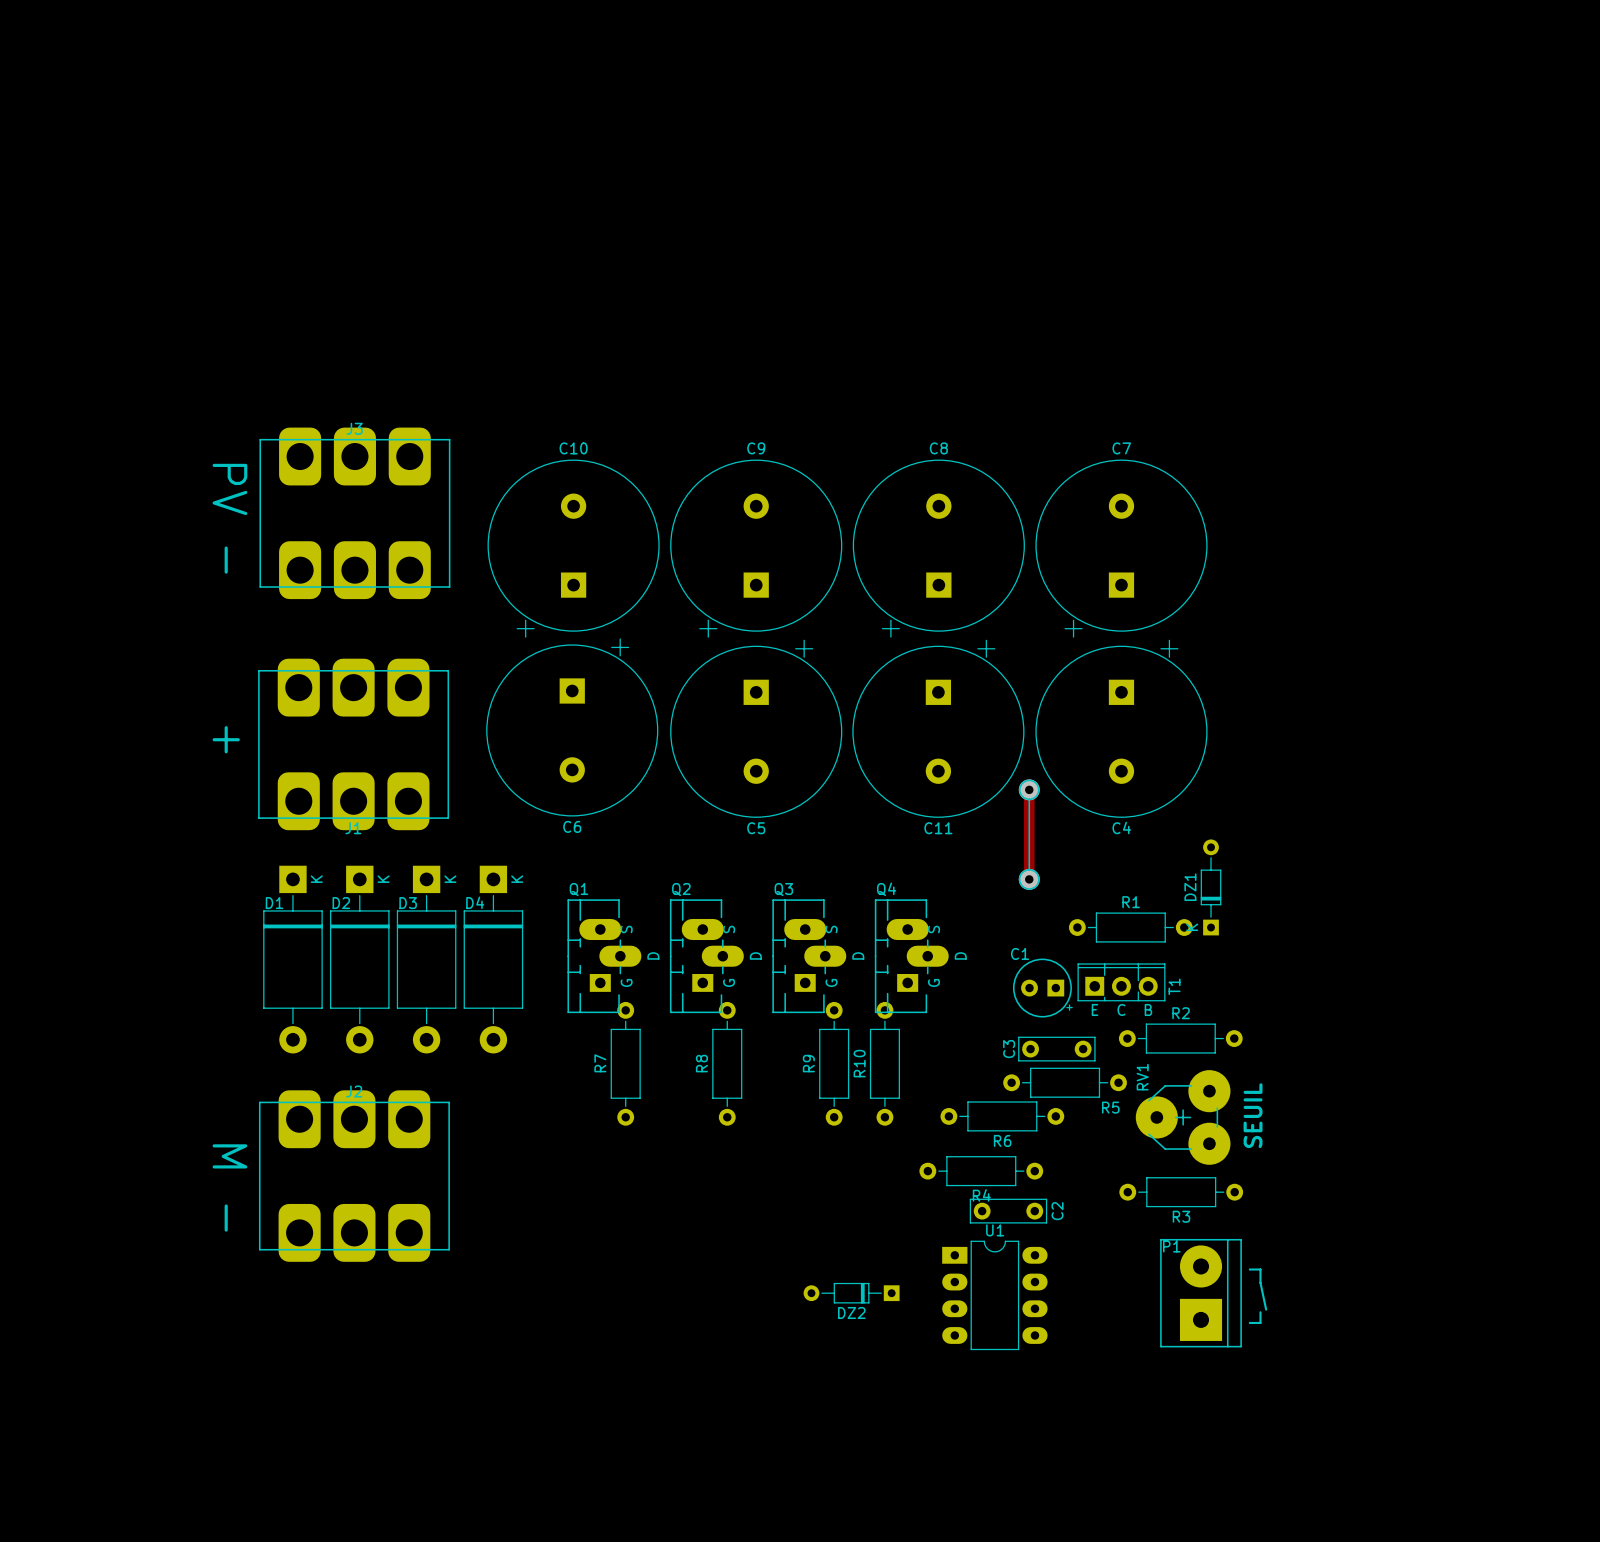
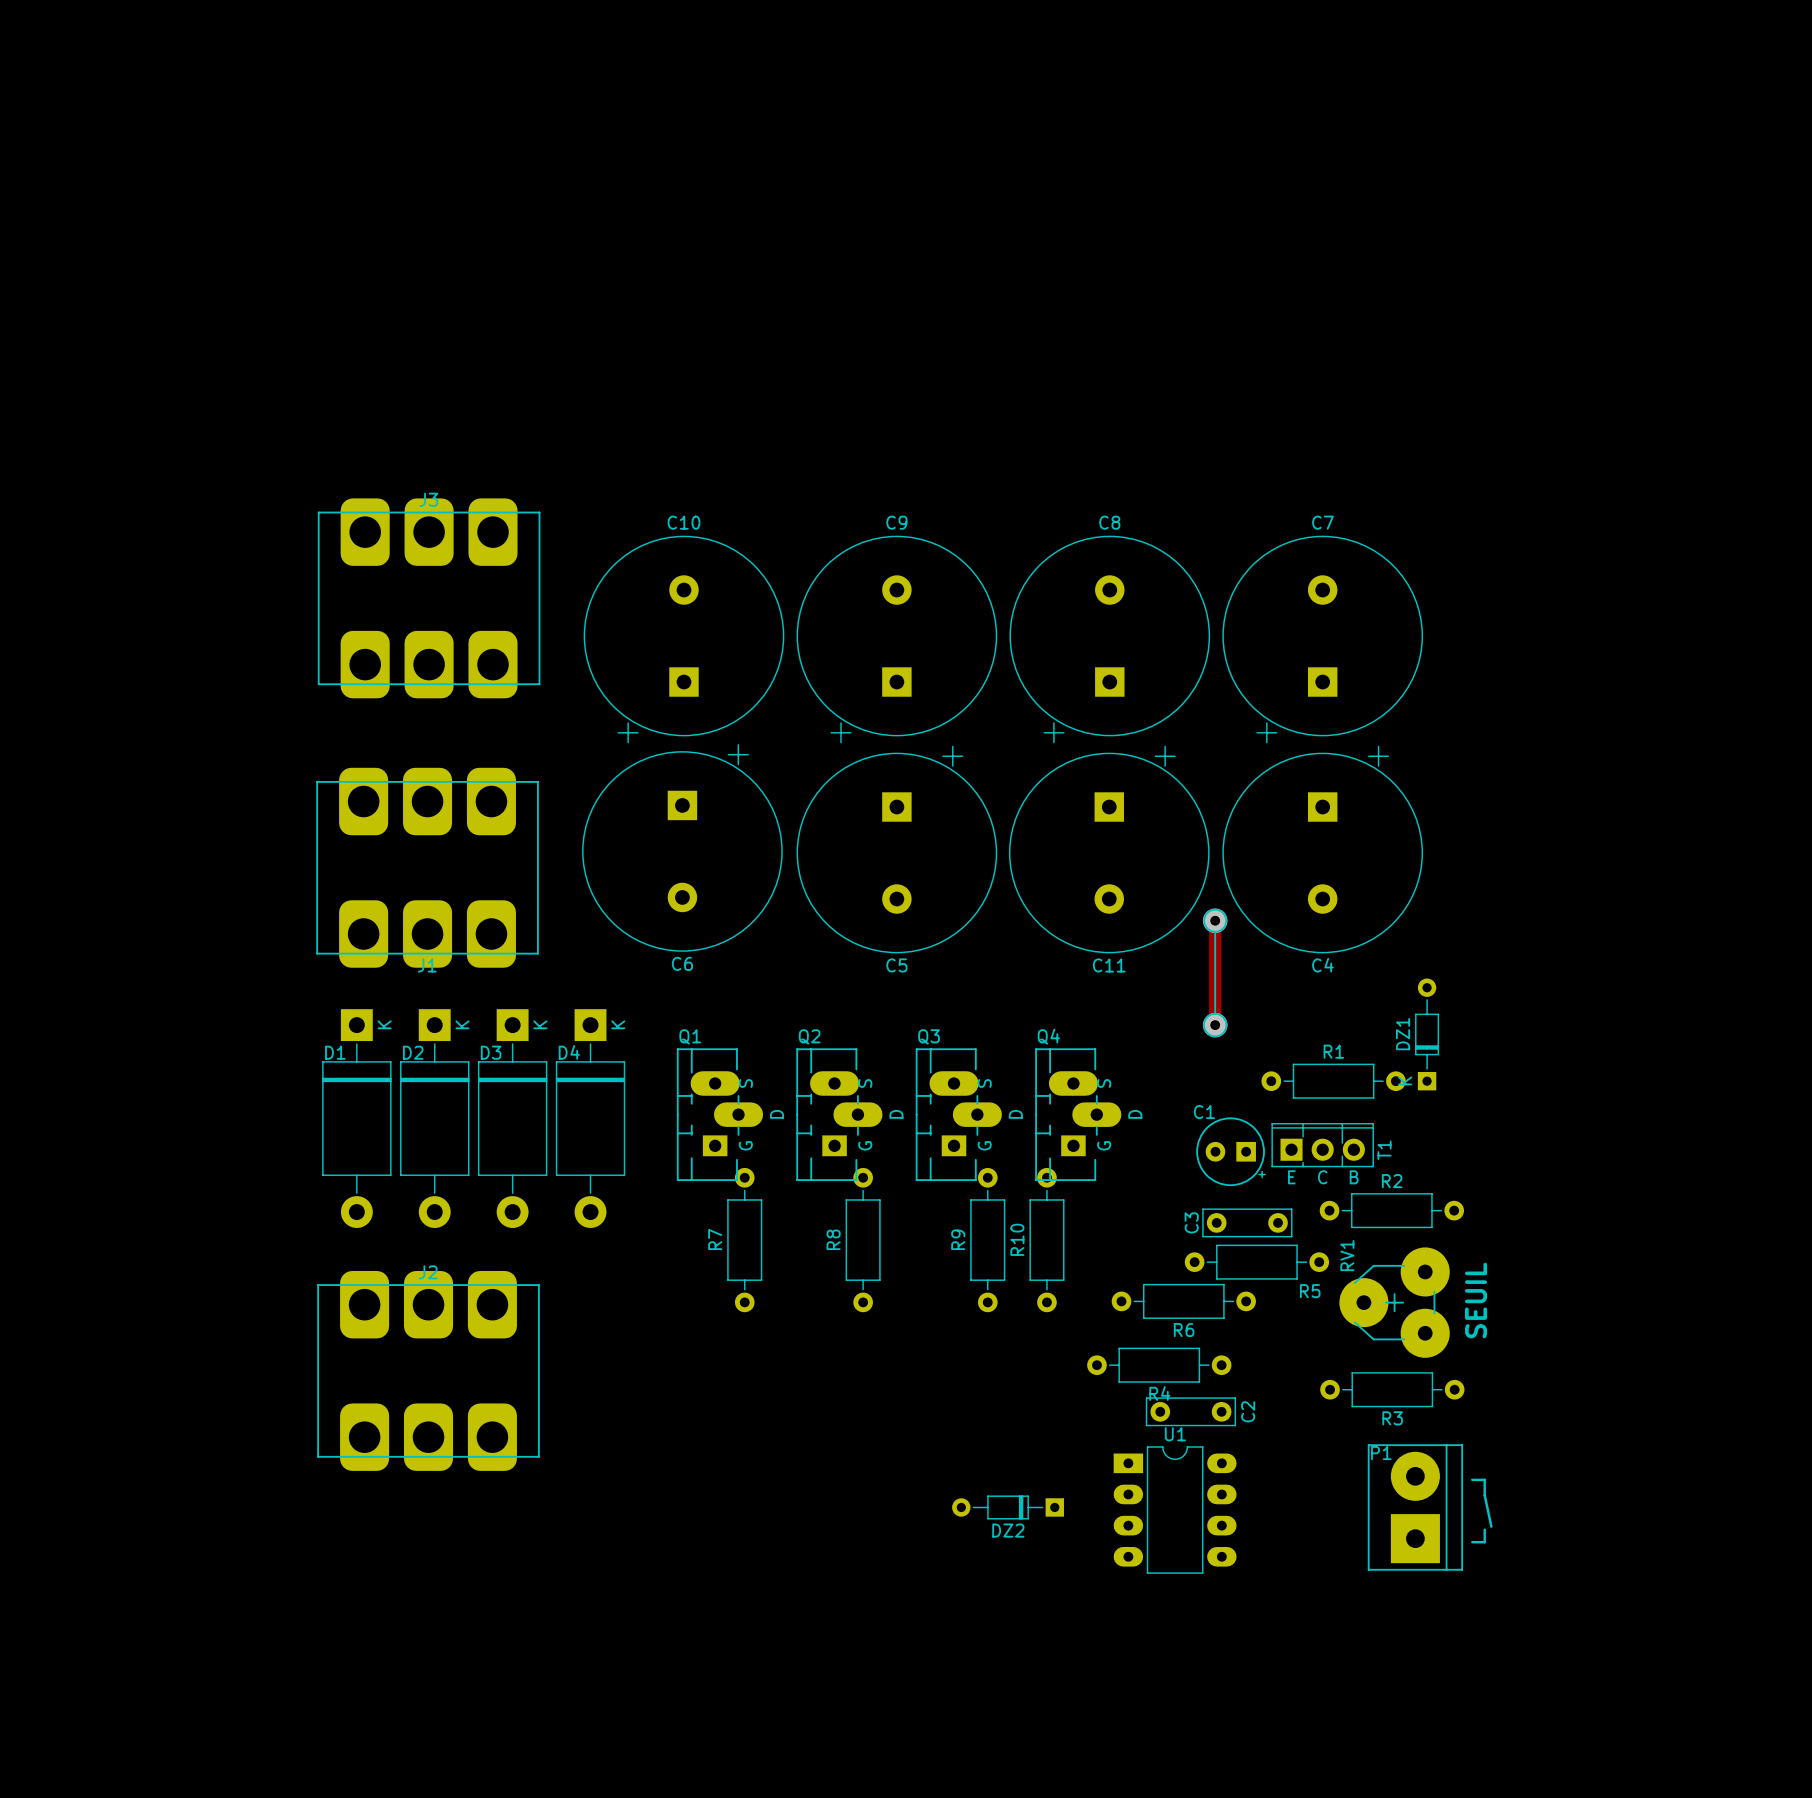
text: PV - (229, 518) -> none
text: + (226, 739) -> none
text: M - (229, 1187) -> none

